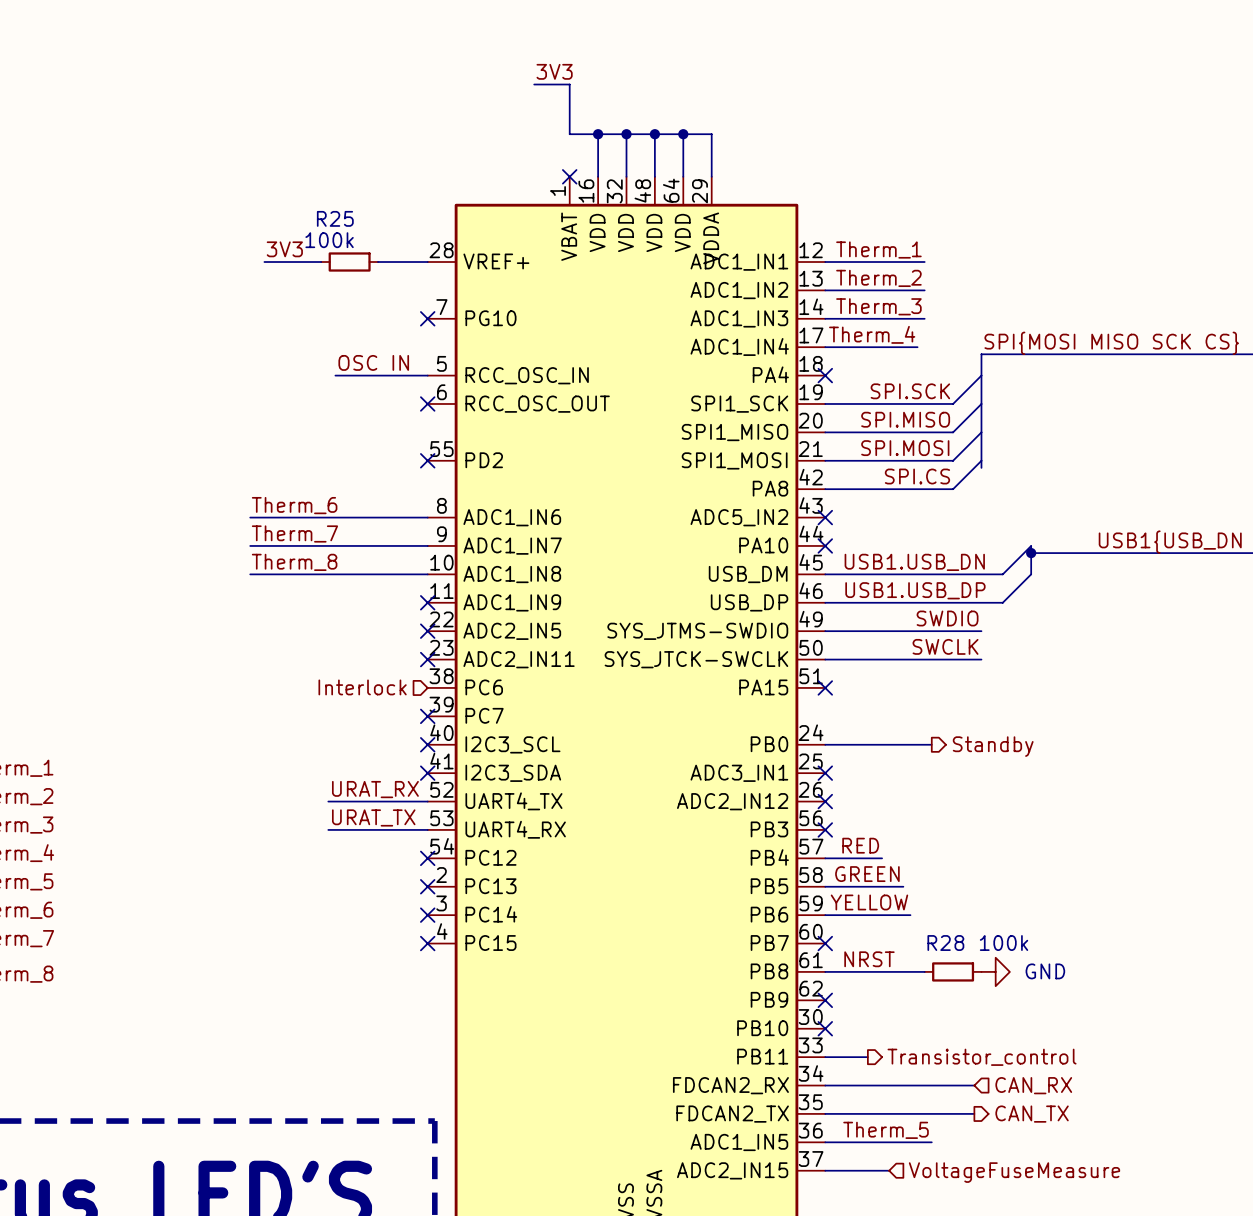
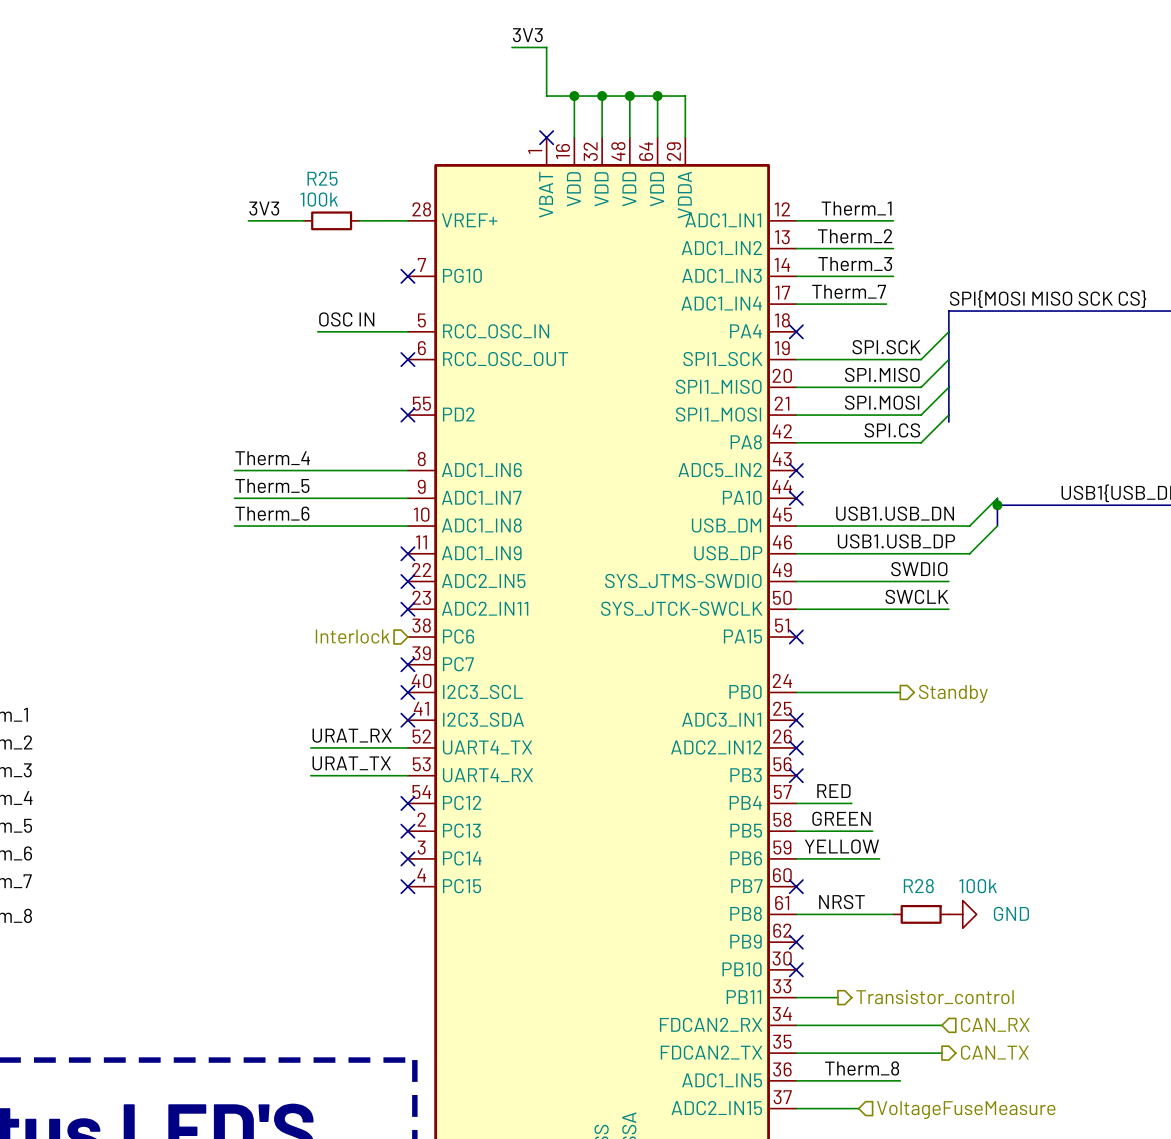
label: Therm_4 (872, 334) -> Therm_7 (849, 291)
label: Therm_6 (294, 505) -> Therm_4 (272, 458)
label: Therm_7 (294, 533) -> Therm_5 (272, 485)
label: Therm_8 (294, 562) -> Therm_6 (272, 513)
label: Therm_5 (886, 1130) -> Therm_8 (862, 1068)

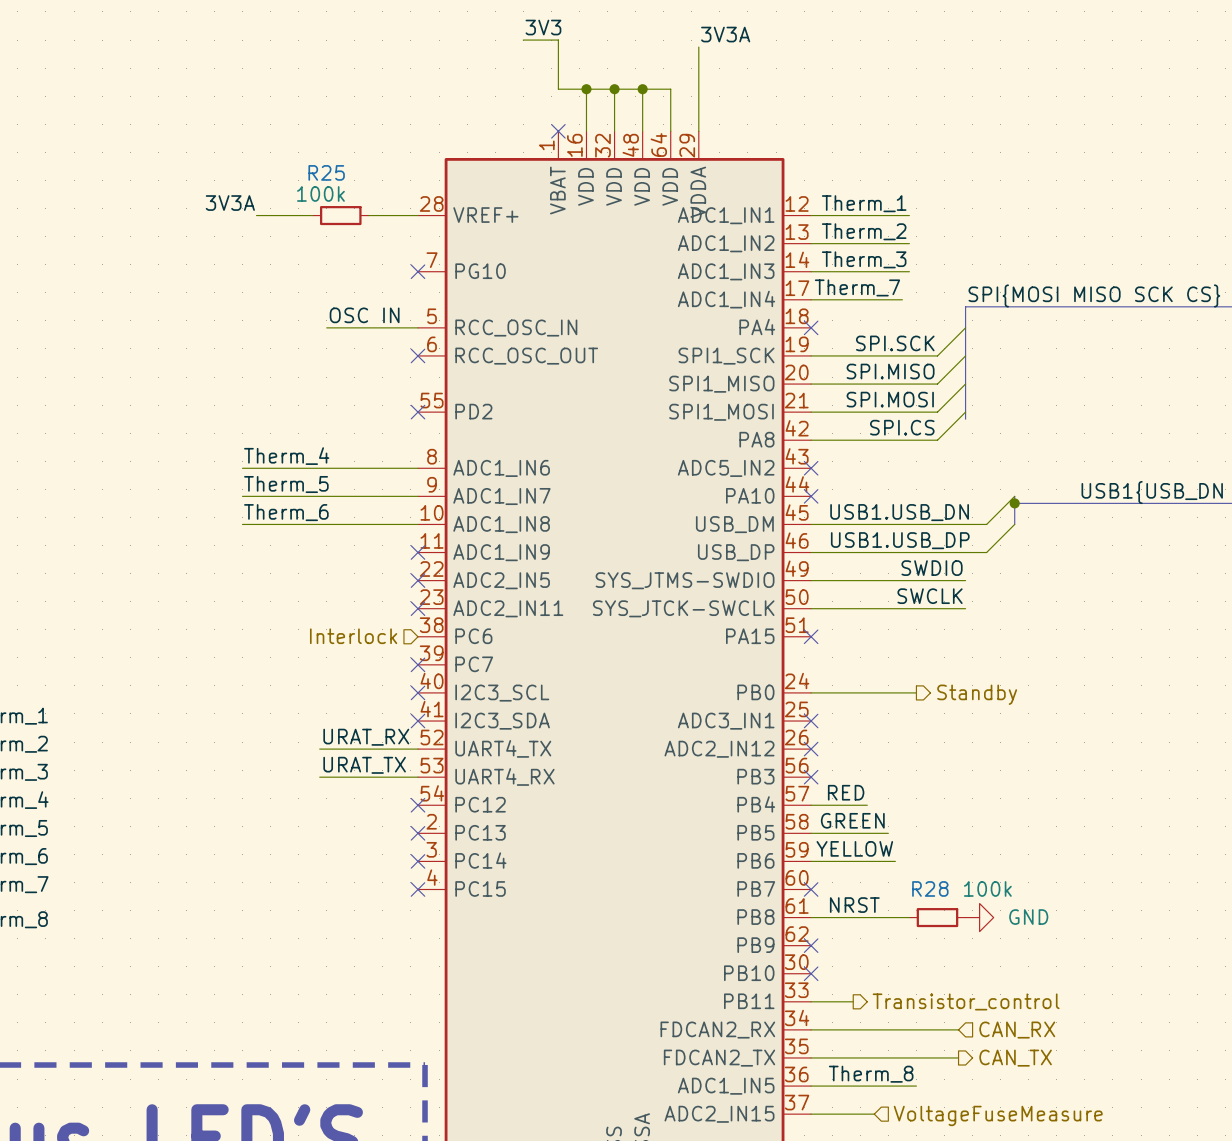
label: none -> 3V3A (725, 34)
wire: (657, 96) (685, 96) -> (698, 47) (698, 89)
junction: (657, 96) -> none
label: 3V3 (264, 208) -> 3V3A (230, 203)

